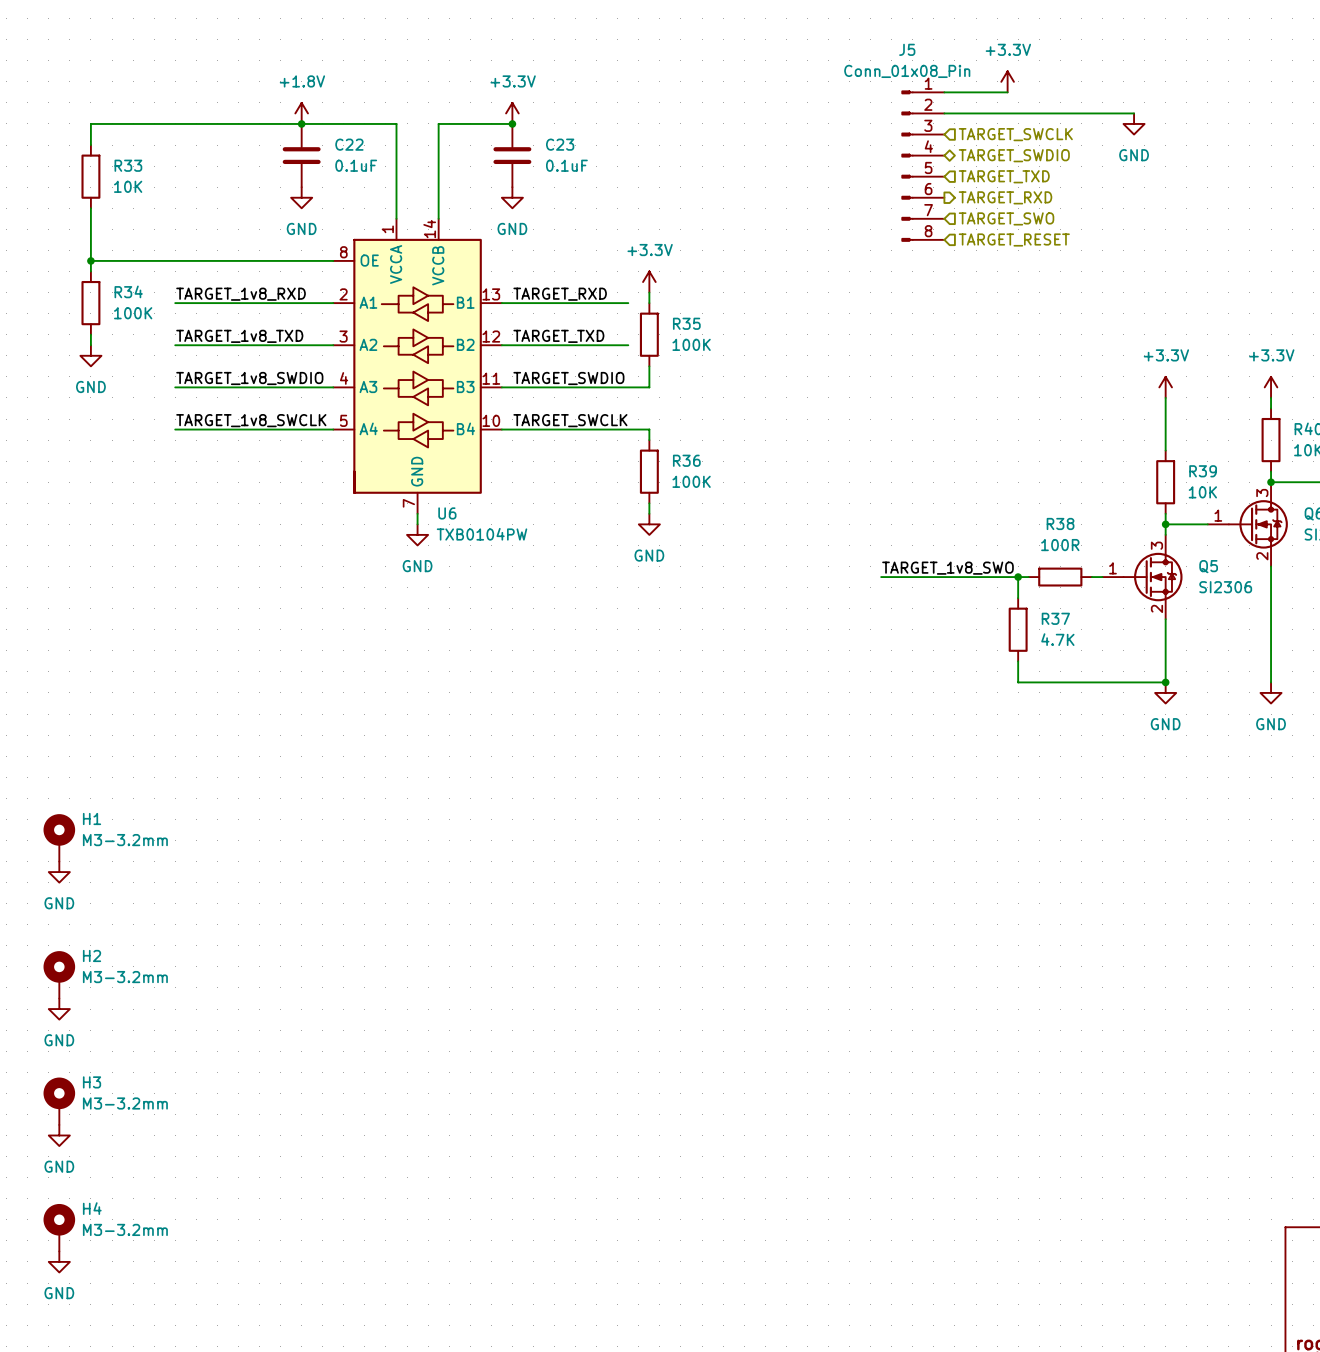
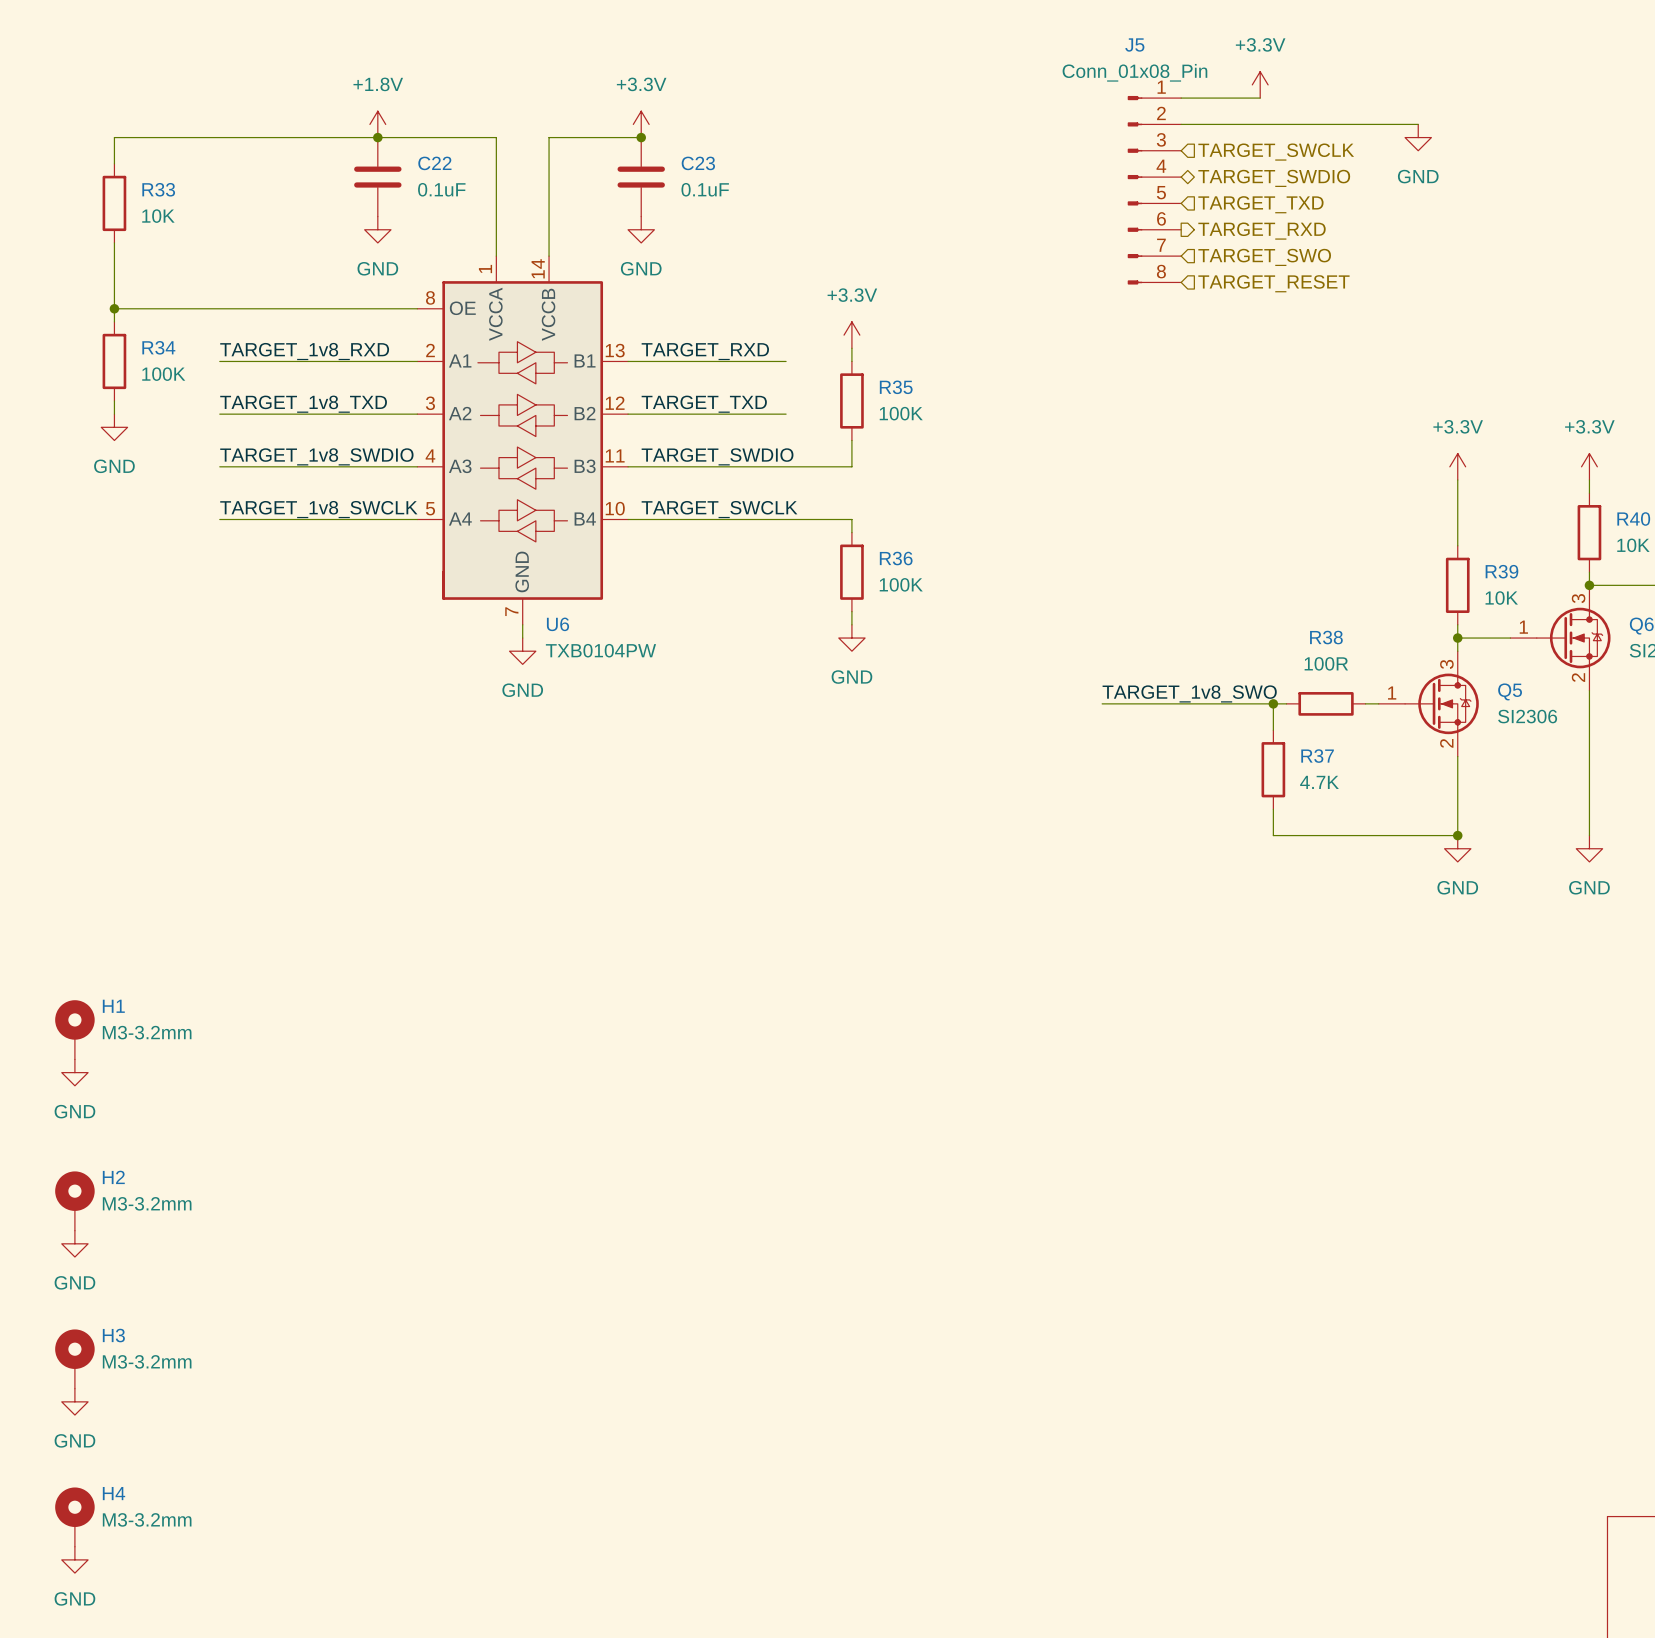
power symbol position: +3.3V (649, 282) -> +3.3V (851, 335)
wire: (649, 292) (649, 303) -> (851, 348) (851, 361)
R35 position: (649, 334) -> (851, 400)
wire: (649, 366) (649, 387) -> (851, 440) (851, 466) (812, 466)
wire: (649, 429) (649, 440) -> (812, 519) (851, 519) (851, 532)
R36 position: (649, 471) -> (851, 572)
wire: (649, 503) (649, 513) -> (851, 611) (851, 624)
power symbol position: GND (649, 524) -> GND (851, 638)

